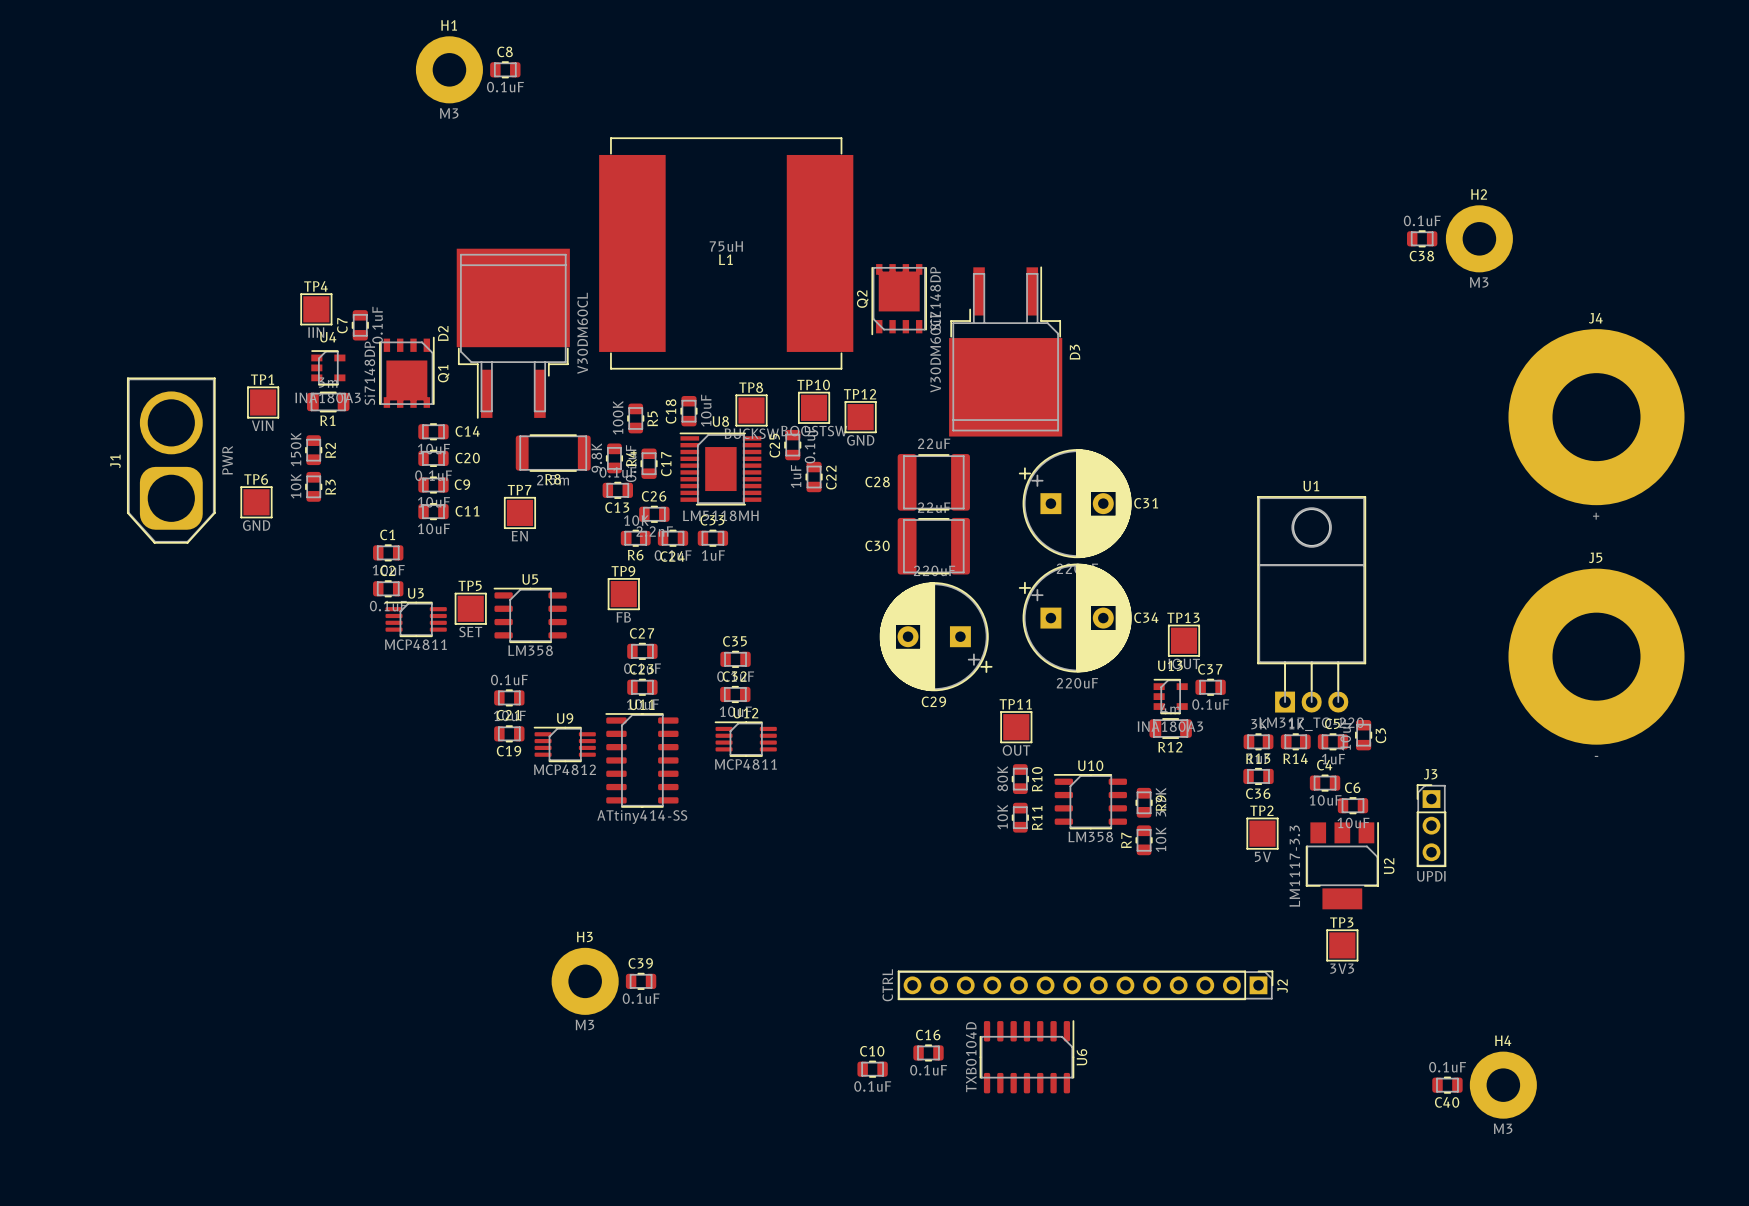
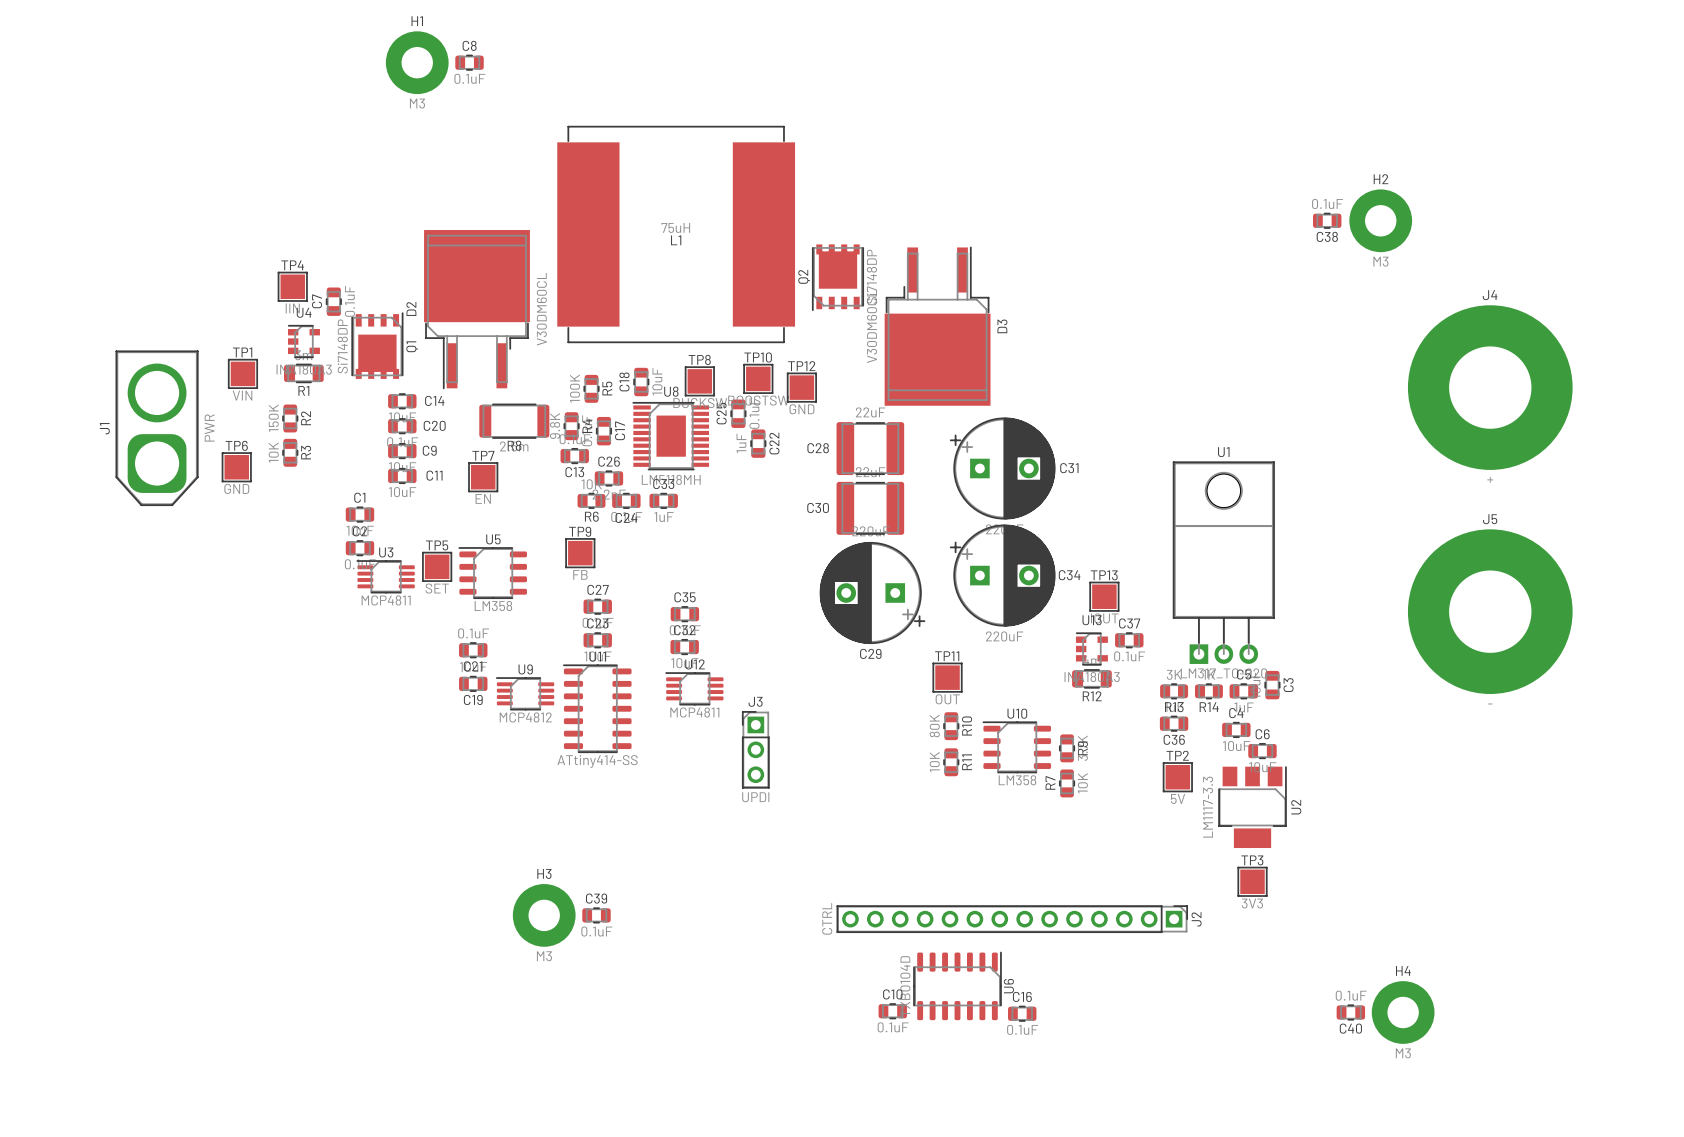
J3 position: (1431, 825) -> (755, 749)
C16 position: (928, 1052) -> (1022, 1013)
C10 position: (872, 1069) -> (892, 1011)

